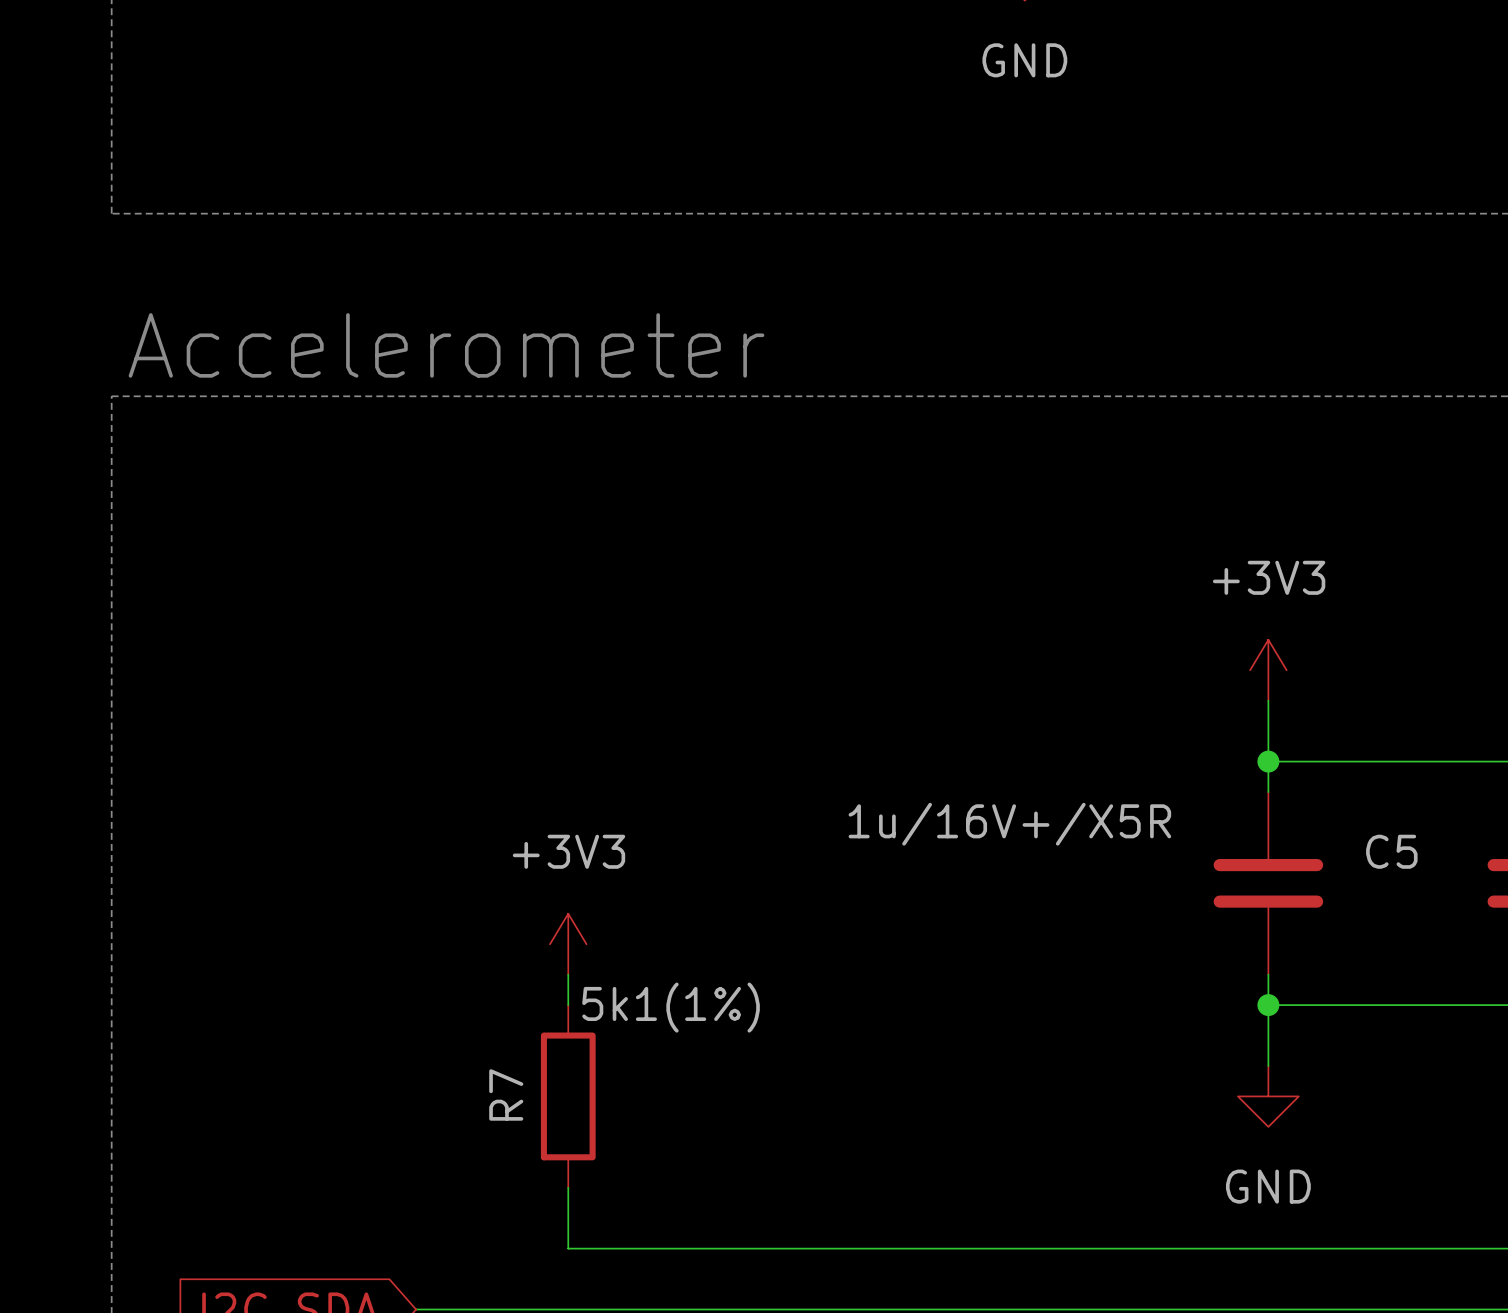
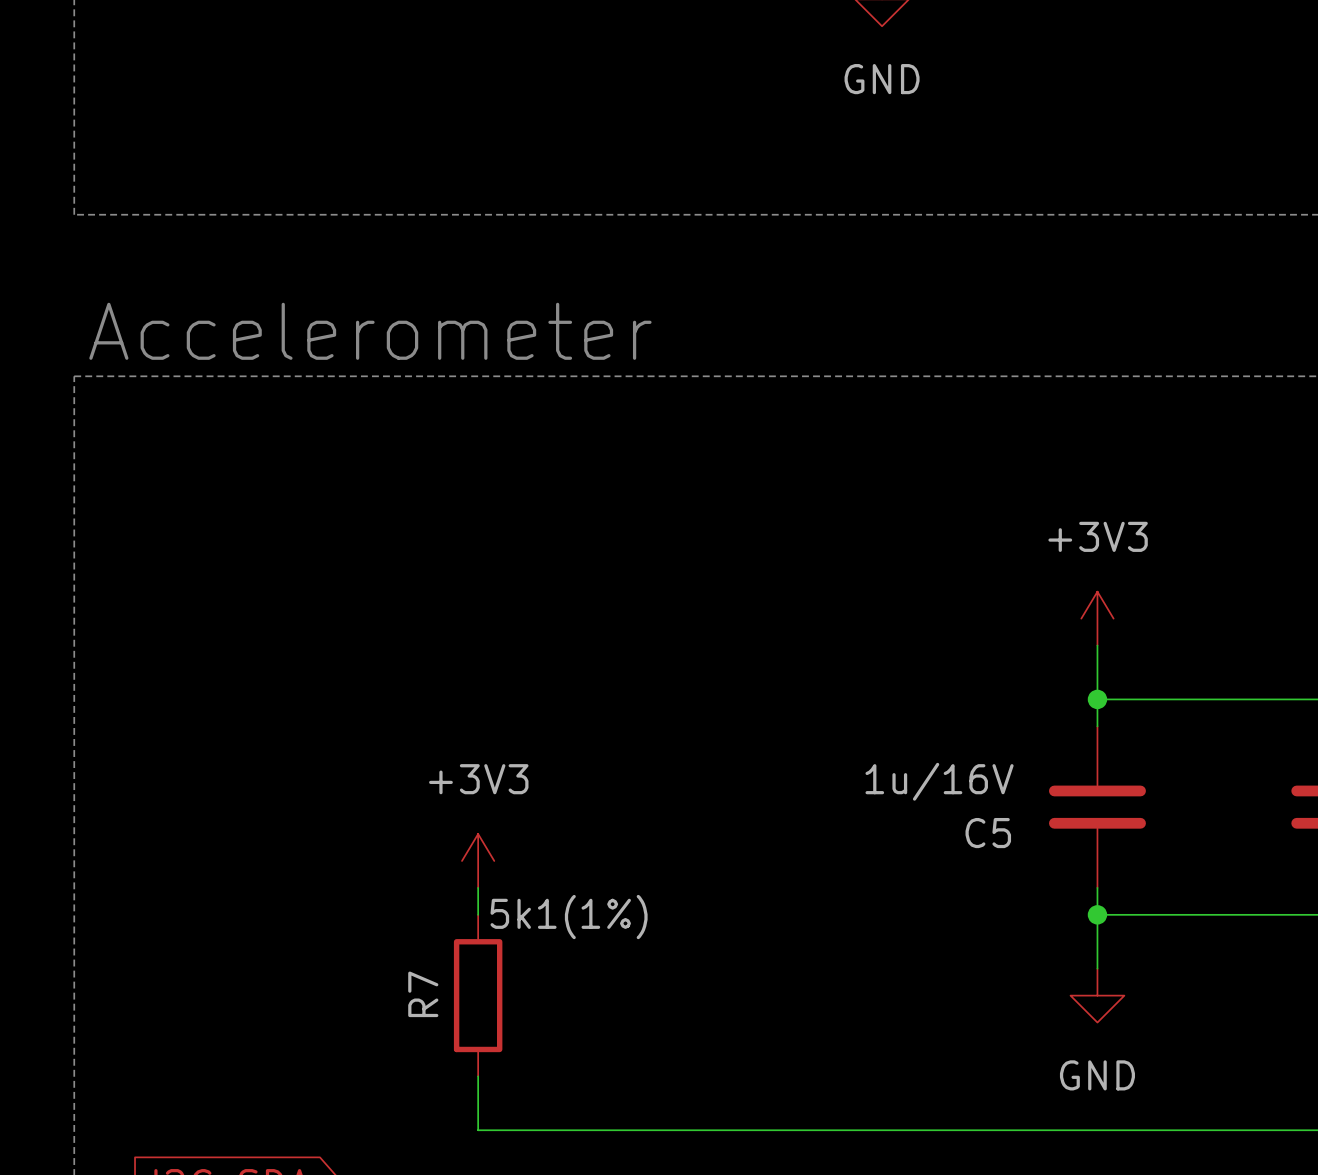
C5 value: 1u/16V+/X5R (1009, 824) -> 1u/16V (939, 781)
C5 name position: C5 (1391, 851) -> C5 (988, 833)

